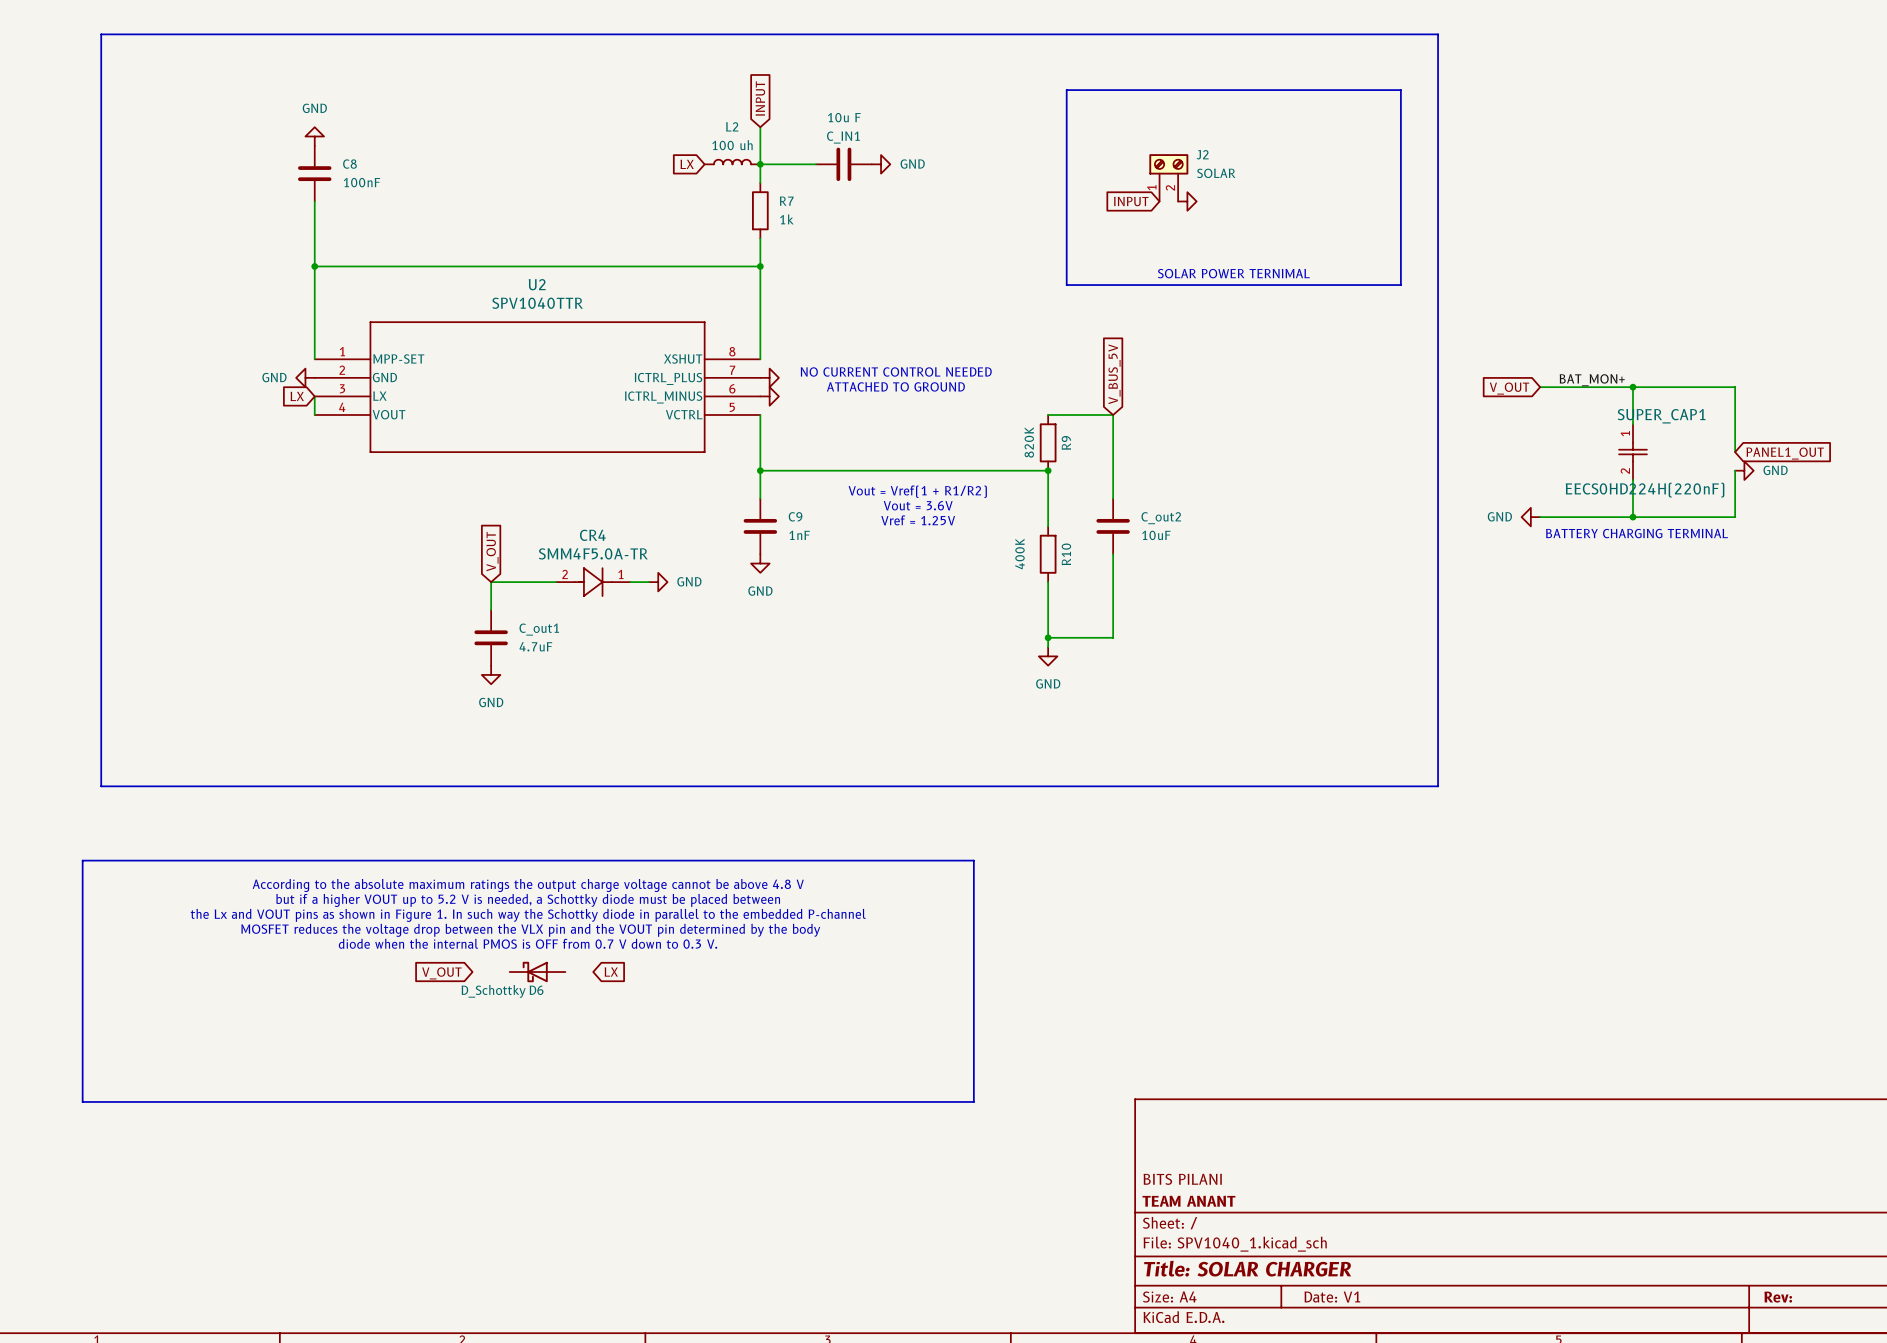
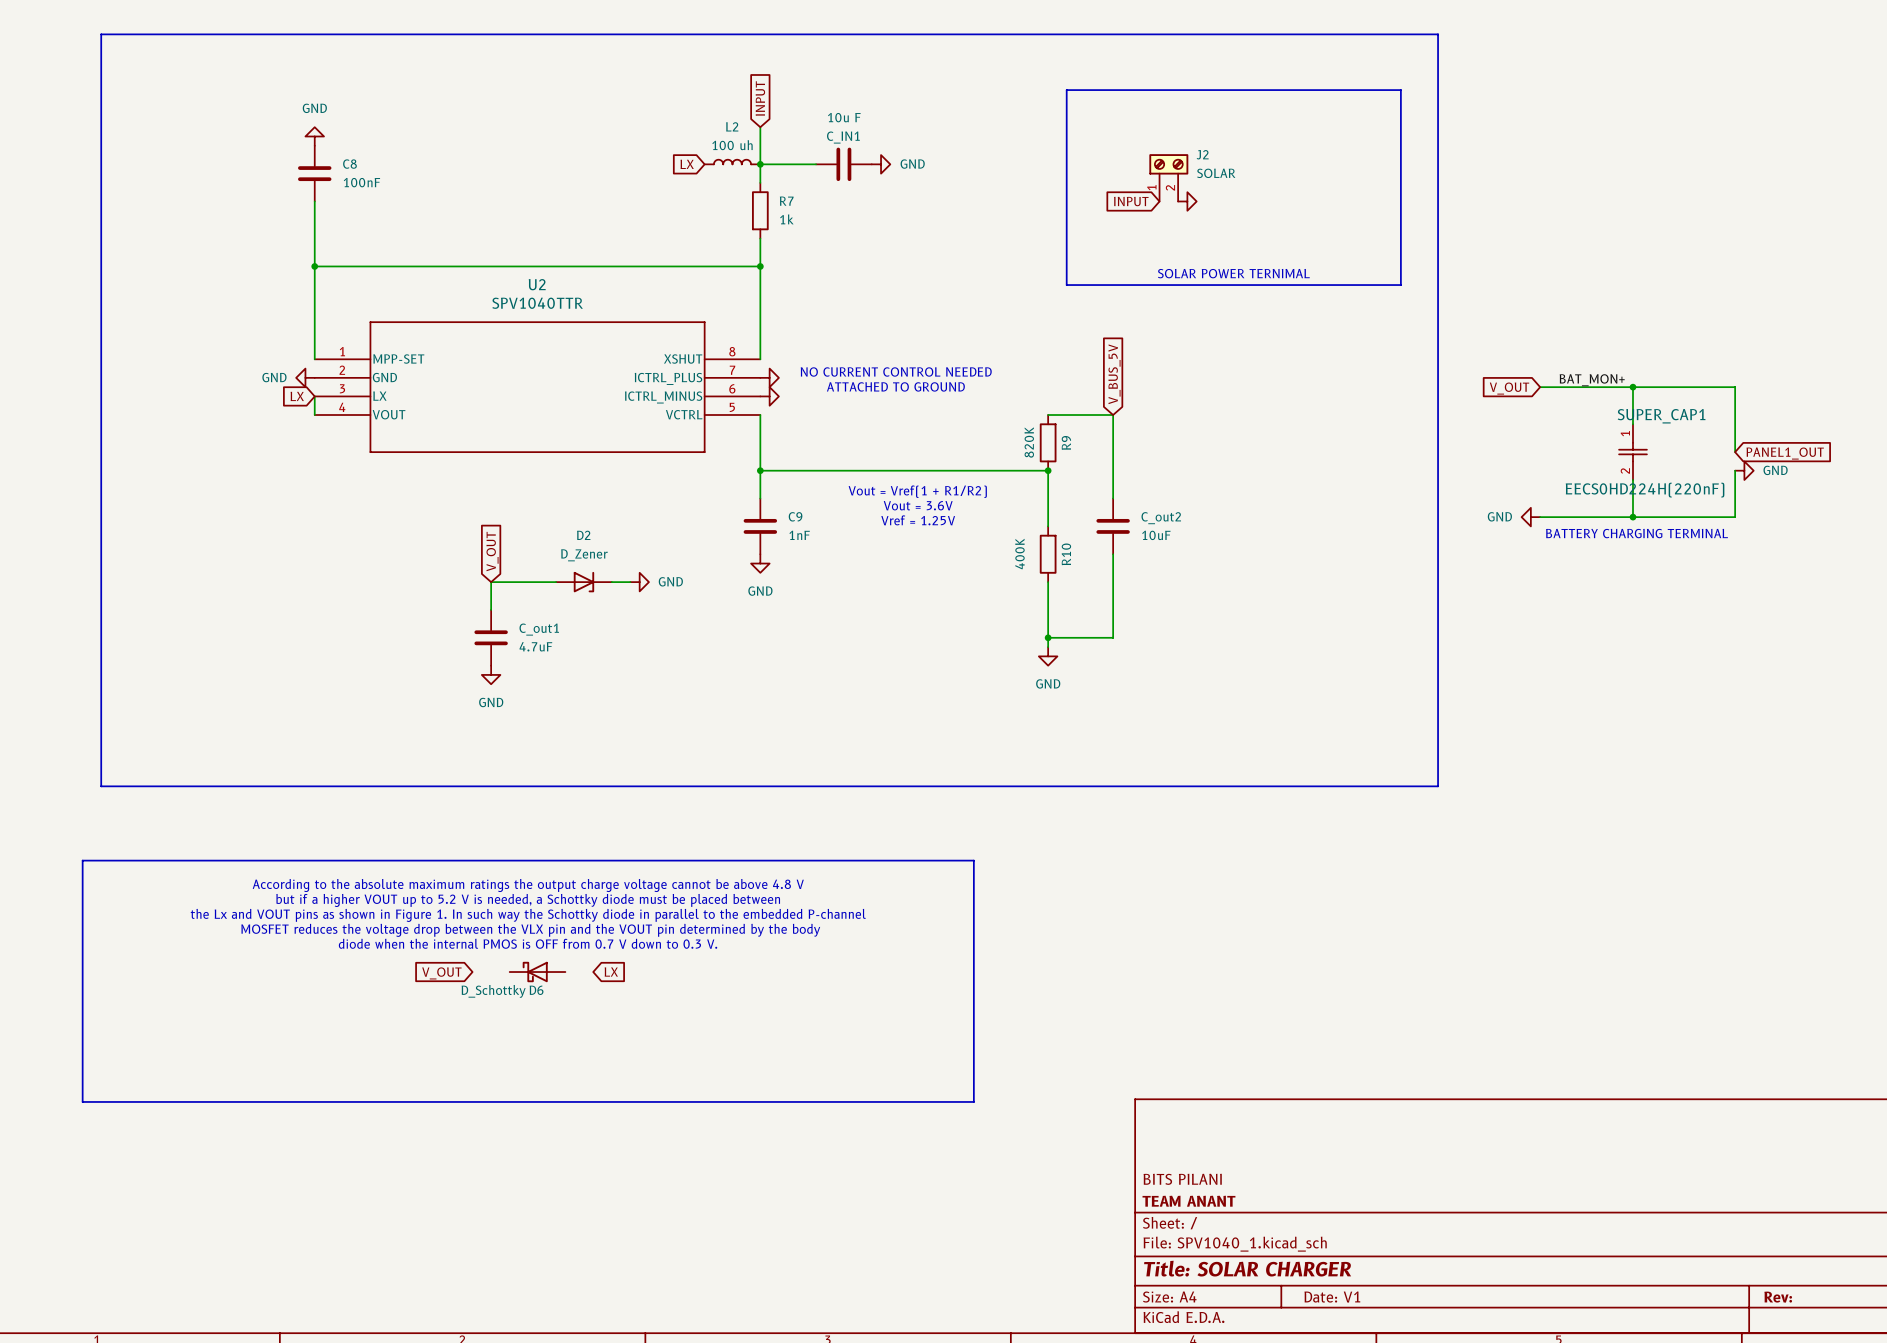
D2: none -> D_Zener (583, 582)
CR4: SMM4F5.0A-TR (593, 582) -> none
power symbol position: GND (658, 582) -> GND (639, 582)

